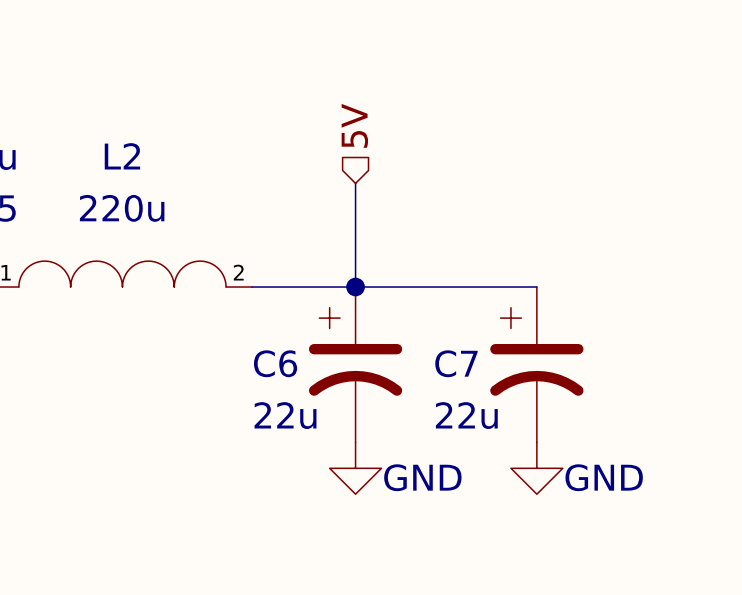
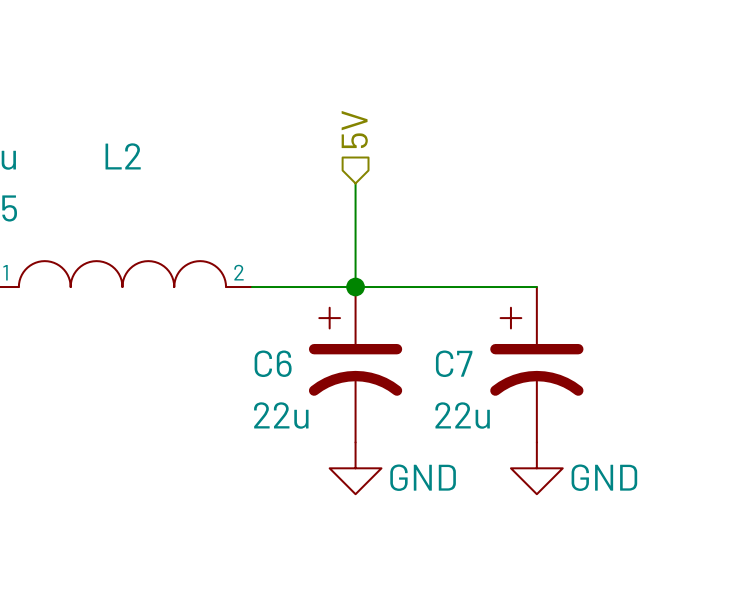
L2 value: 220u (122, 208) -> none

